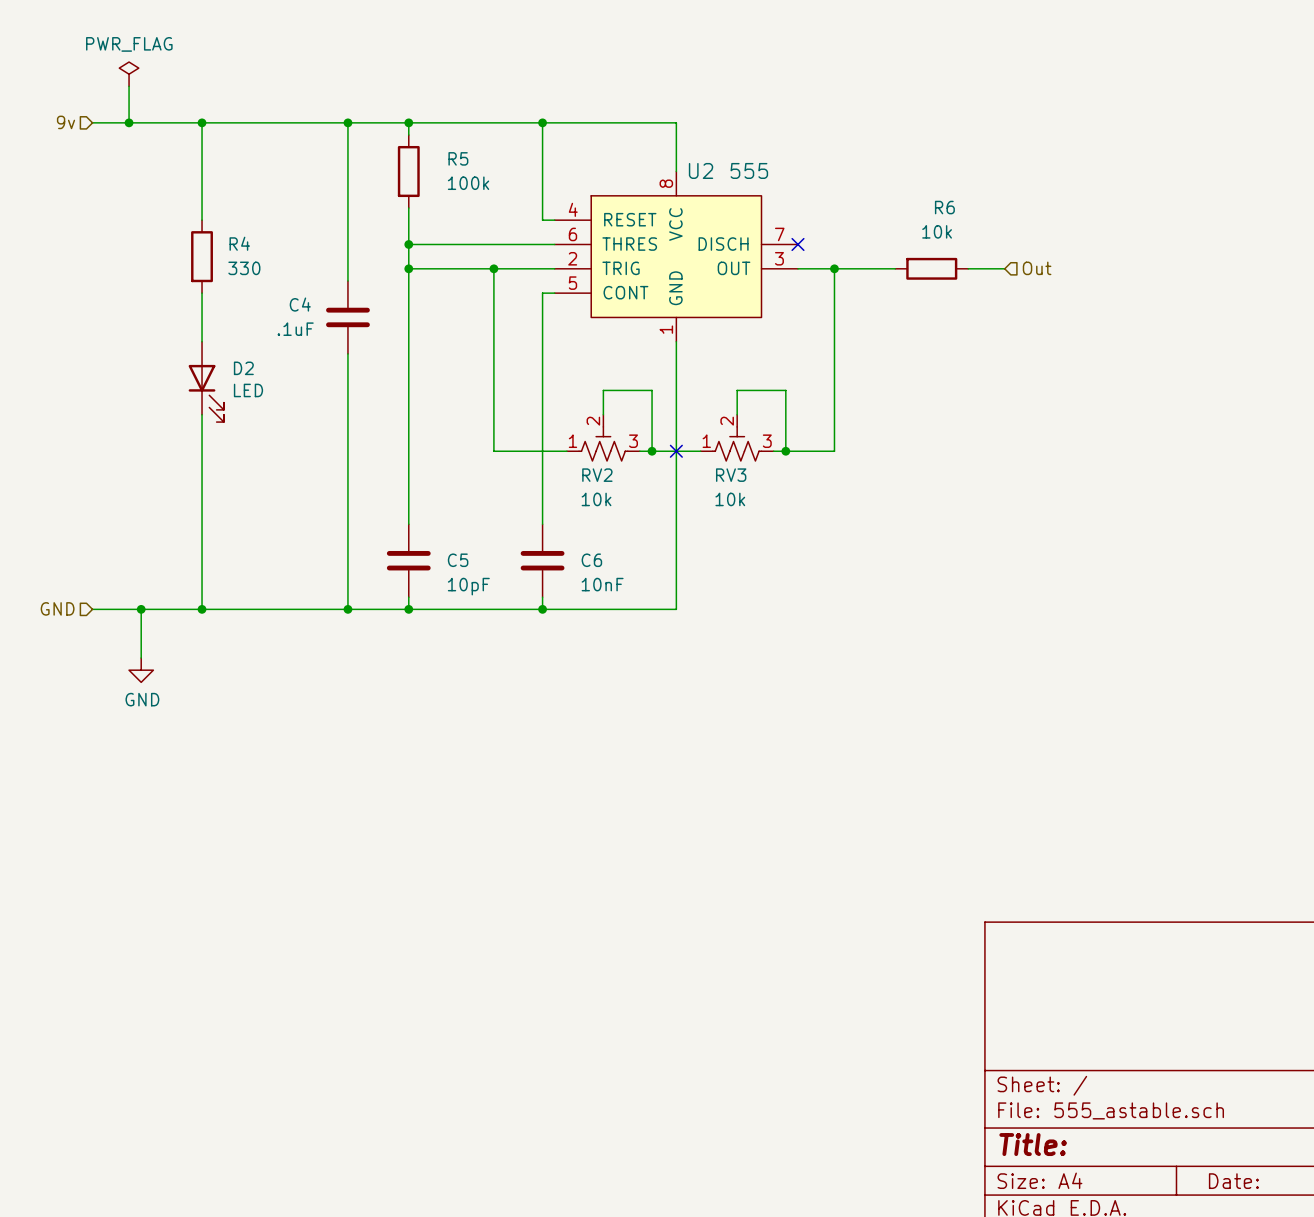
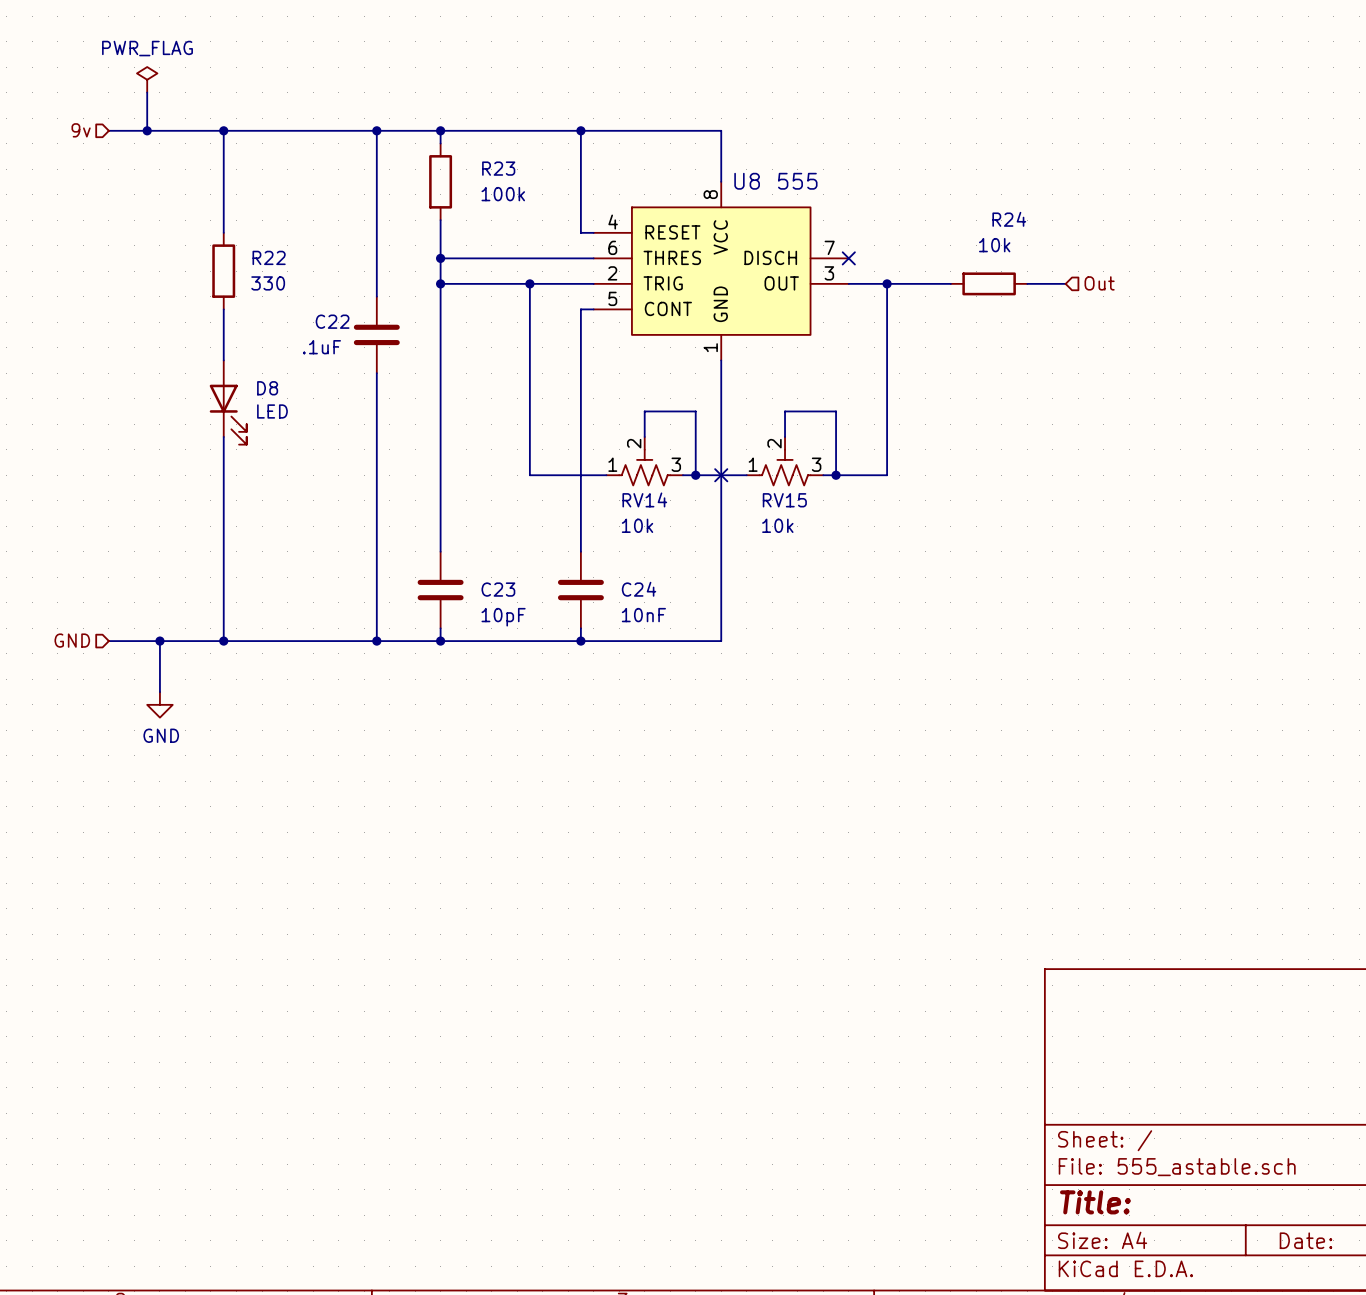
R5 name: R5 (458, 158) -> R23 (498, 168)
U2 name: U2 (701, 170) -> U8 (747, 181)
R6 name: R6 (944, 207) -> R24 (1009, 219)
R4 name: R4 (239, 243) -> R22 (269, 257)
C4 name: C4 (300, 304) -> C22 (332, 321)
D2 name: D2 (243, 368) -> D8 (267, 388)
RV2 name: RV2 (597, 475) -> RV14 (644, 499)
RV3 name: RV3 (731, 475) -> RV15 (784, 500)
C5 name: C5 (458, 560) -> C23 (498, 589)
C6 name: C6 (591, 560) -> C24 (639, 589)

